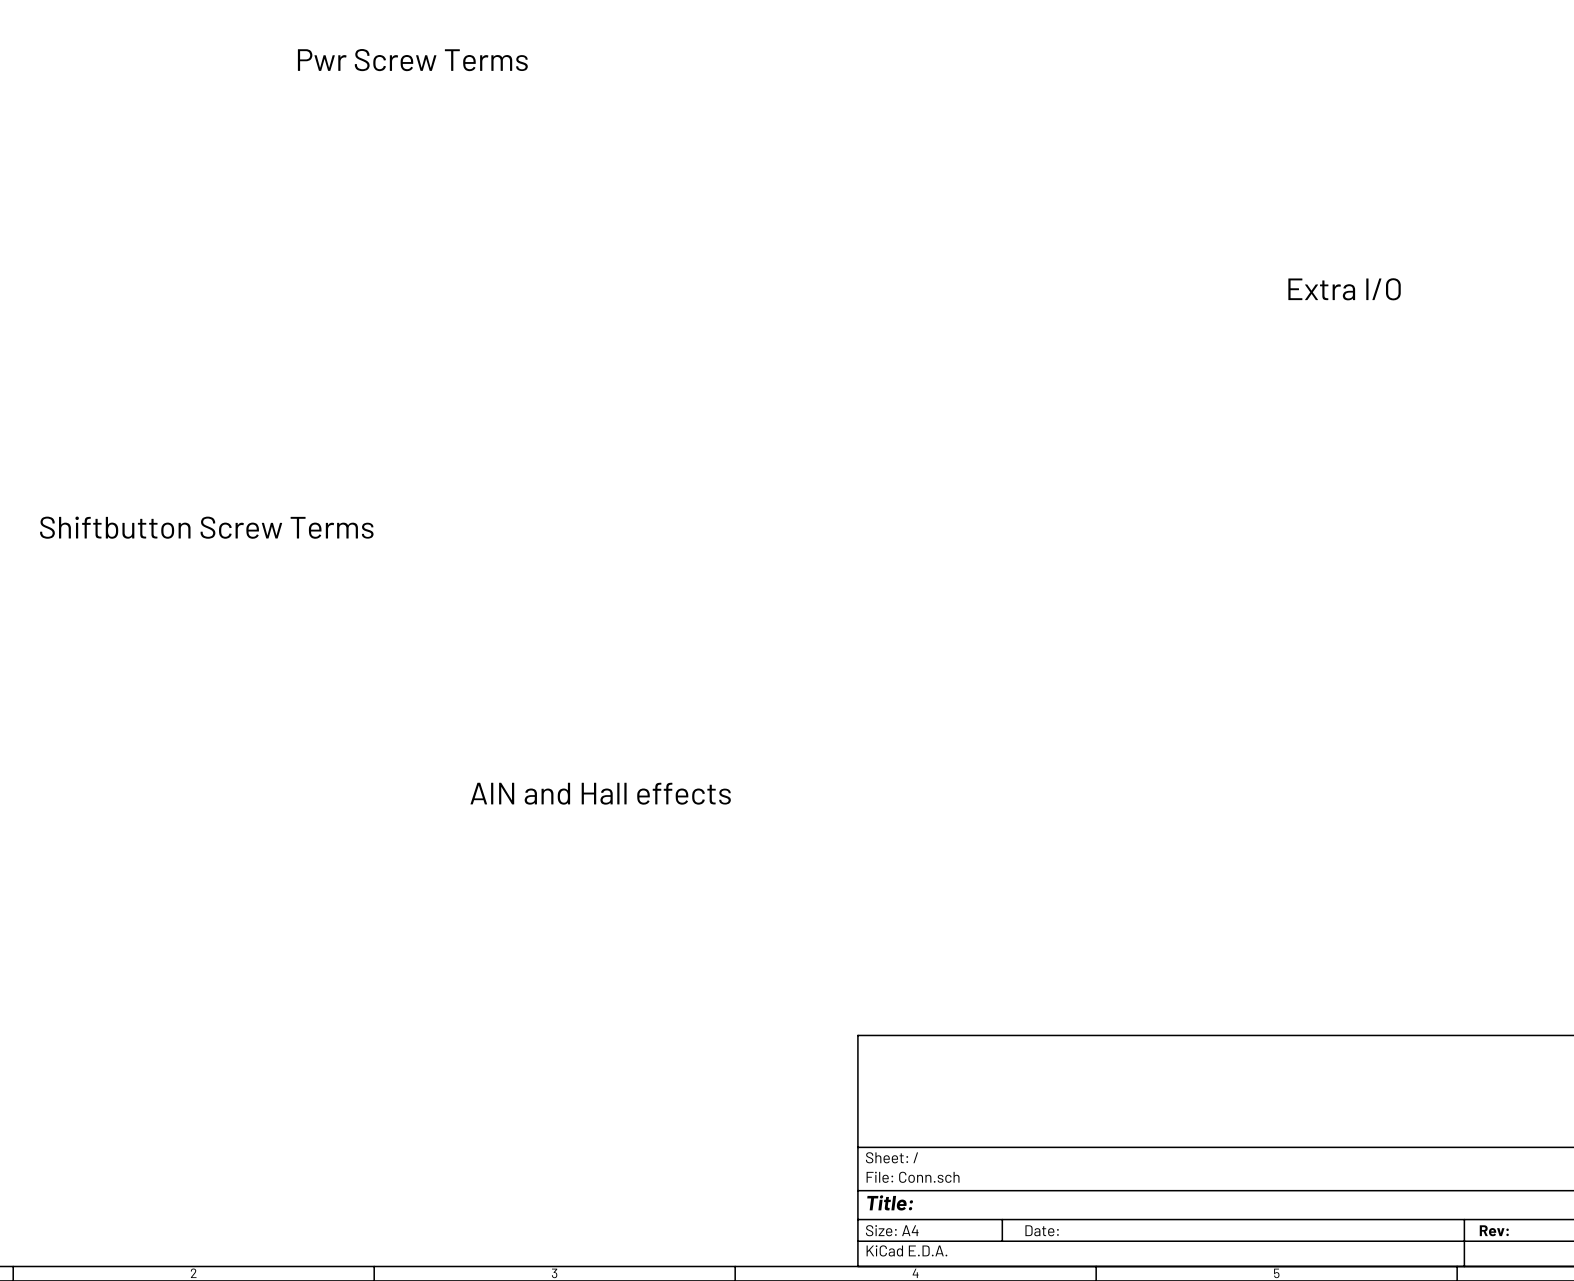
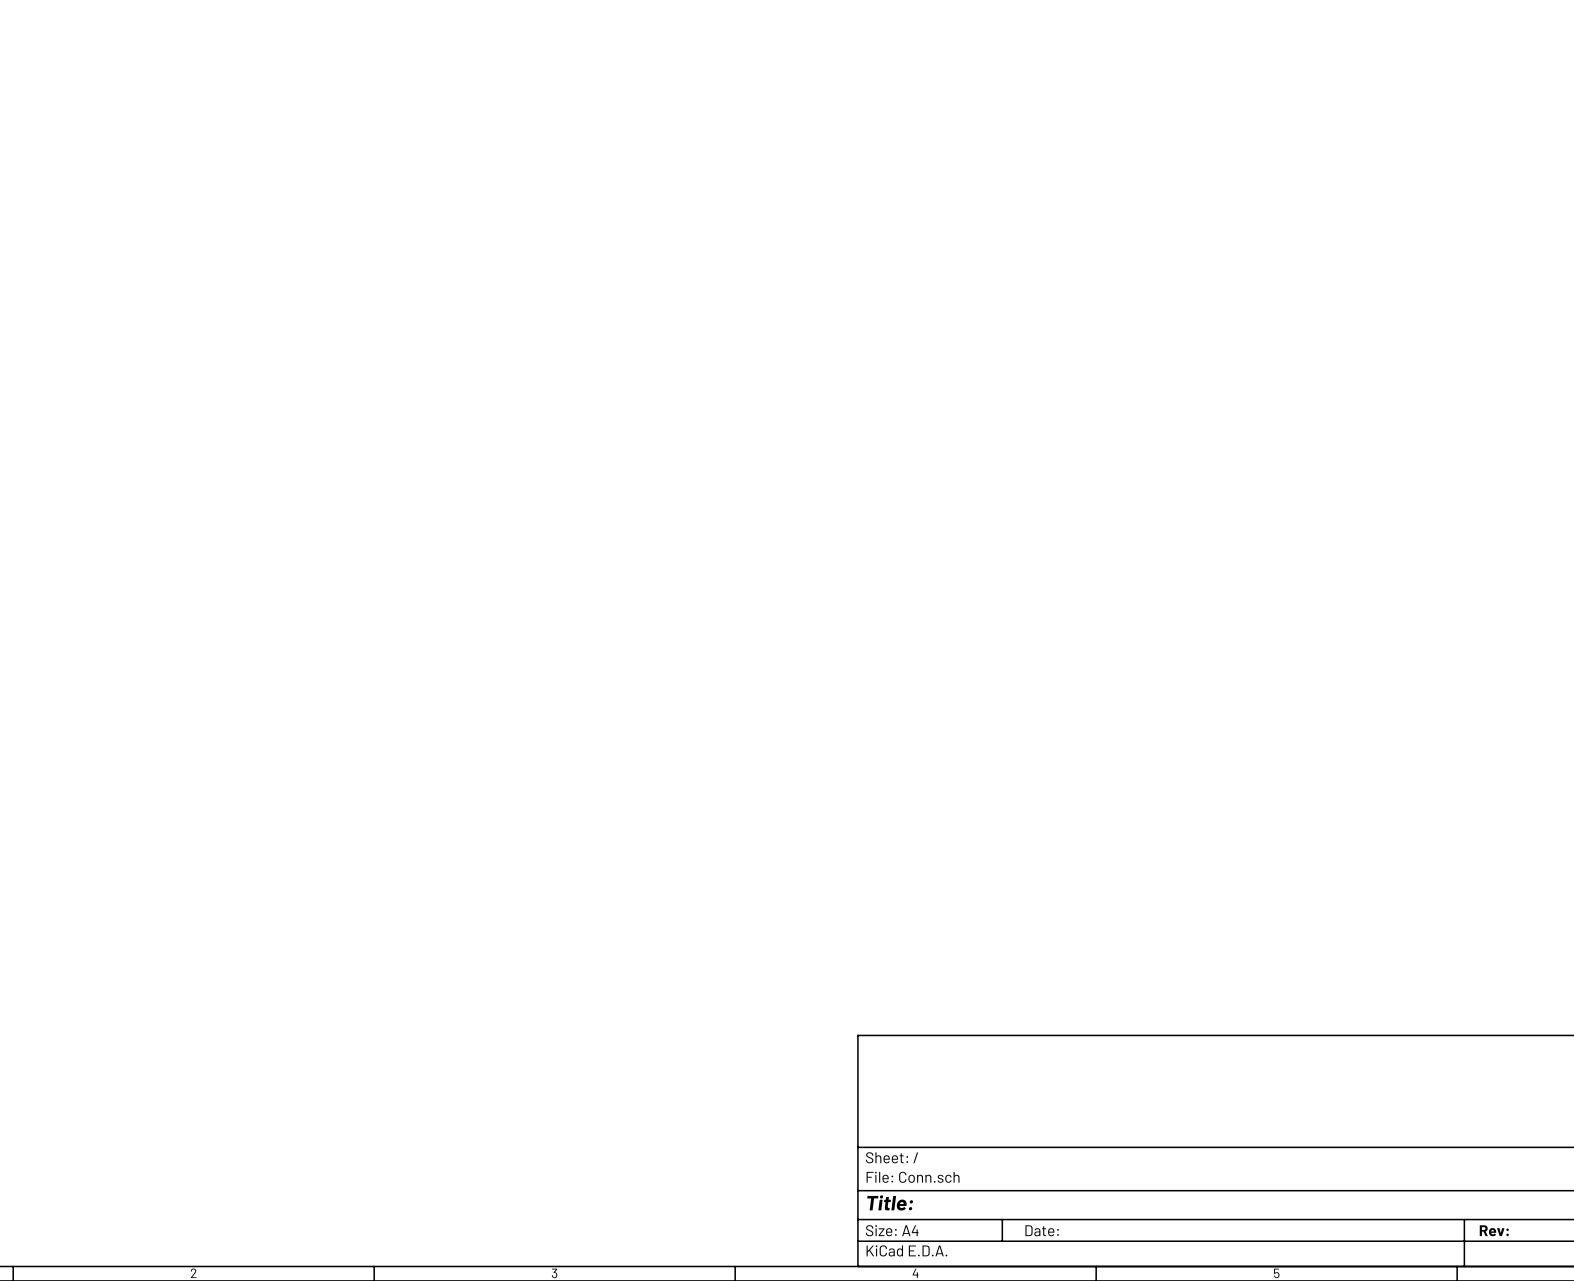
text: Pwr Screw Terms (412, 60) -> none
text: Extra I/O (1344, 289) -> none
text: Shiftbutton Screw Terms (206, 527) -> none
text: AIN and Hall effects (600, 793) -> none

